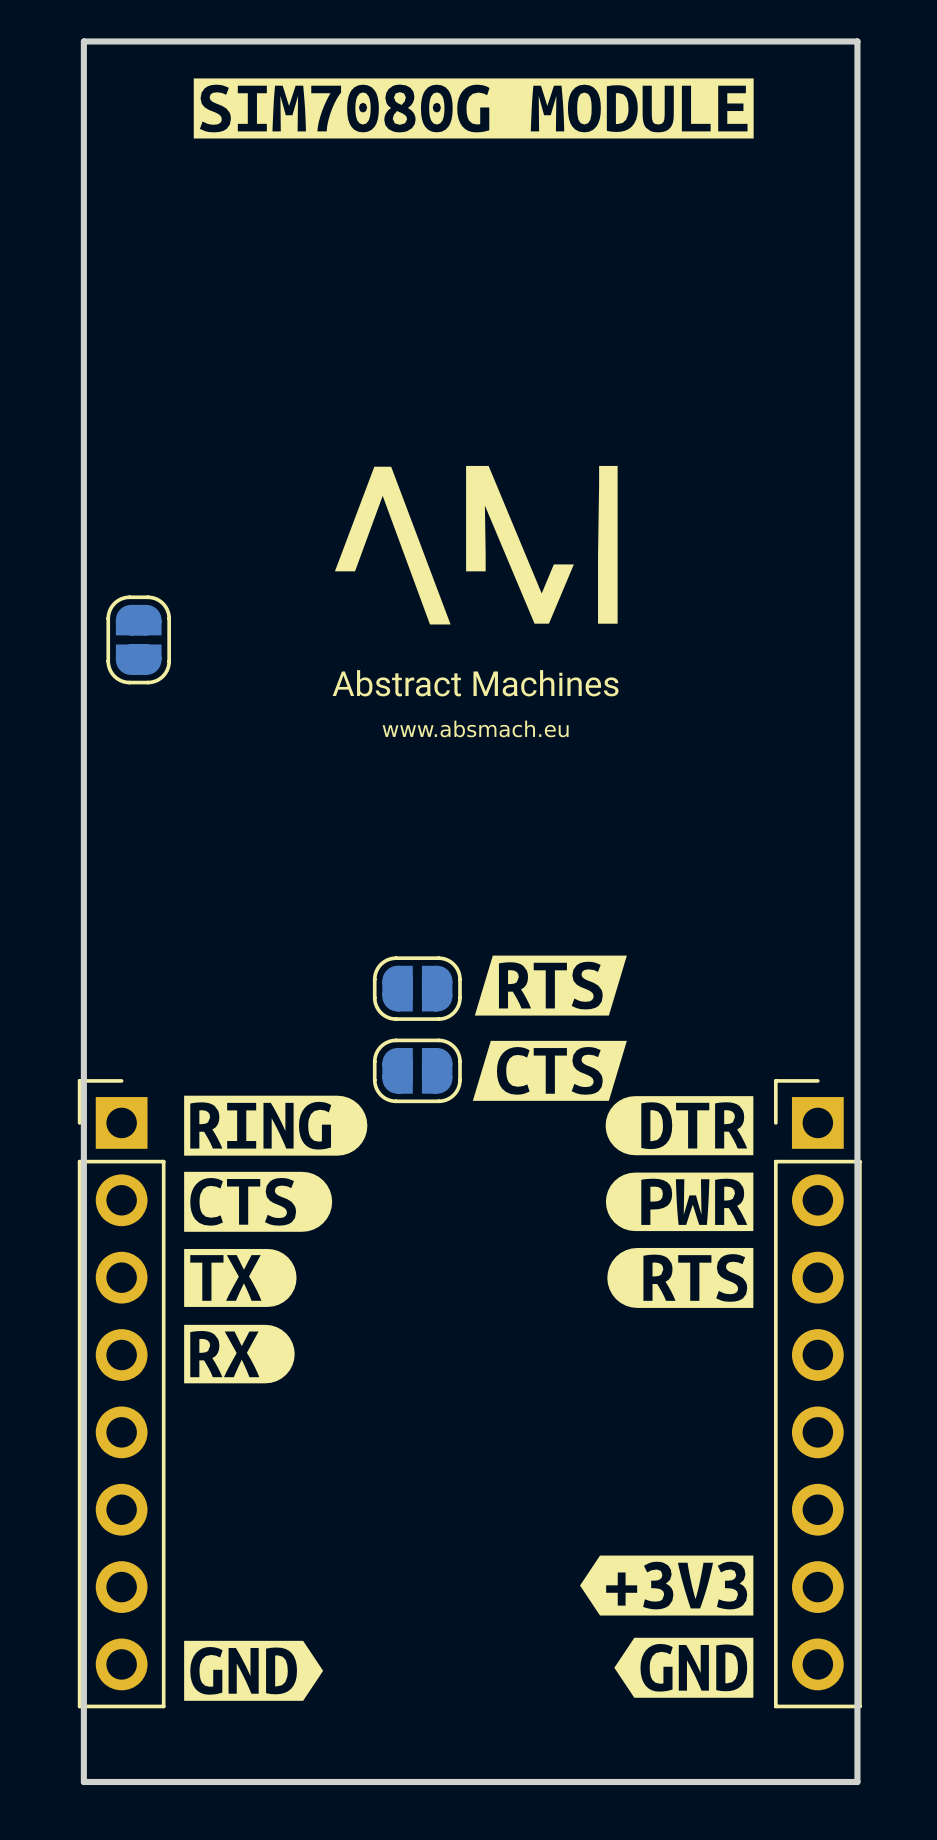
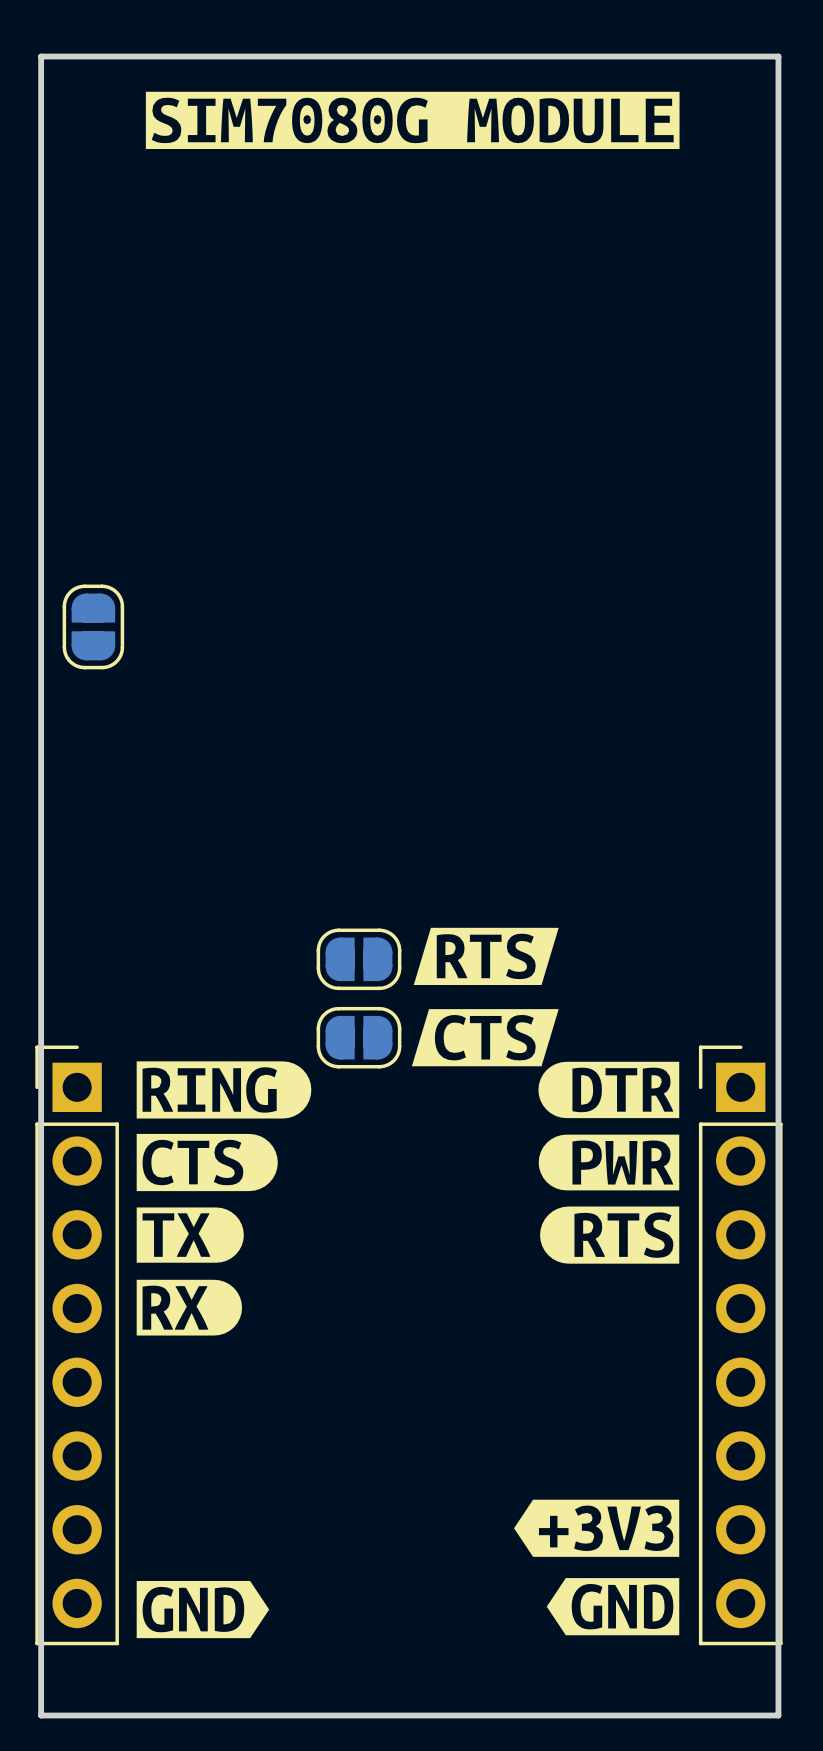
drawing: [334, 465, 618, 625] -> none
drawing: [332, 670, 619, 738] -> none

